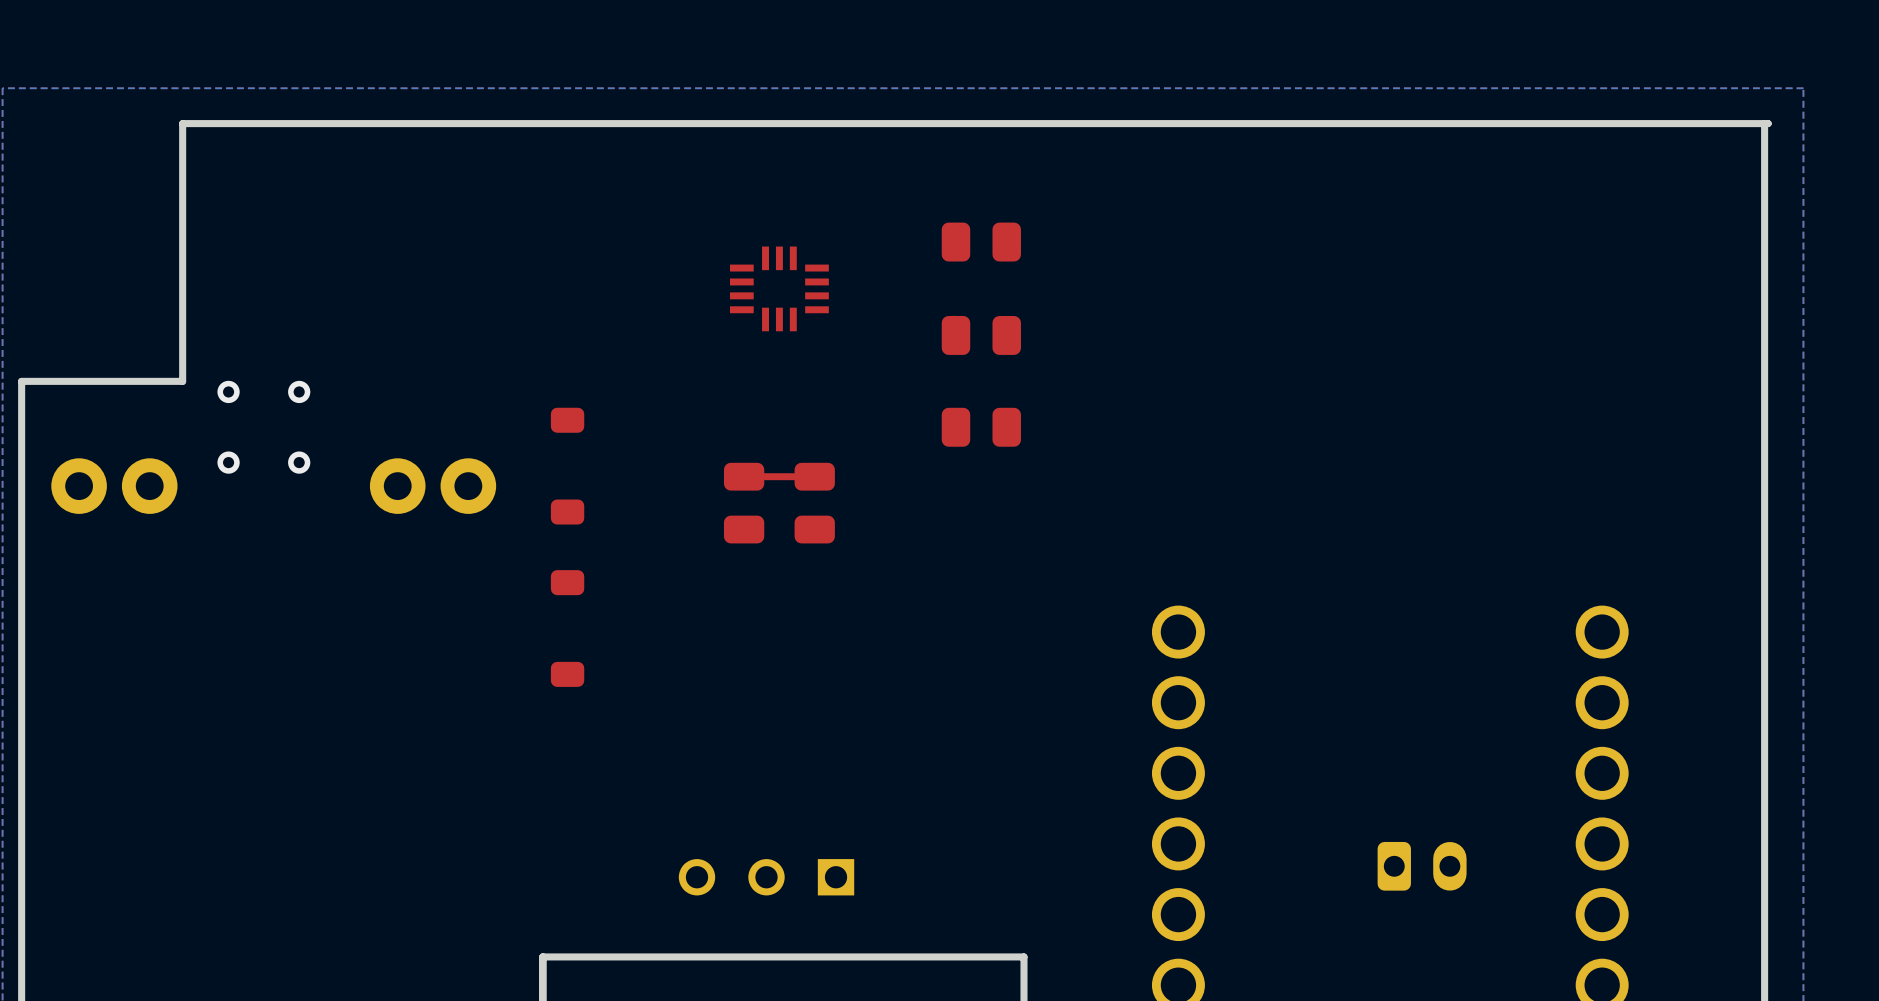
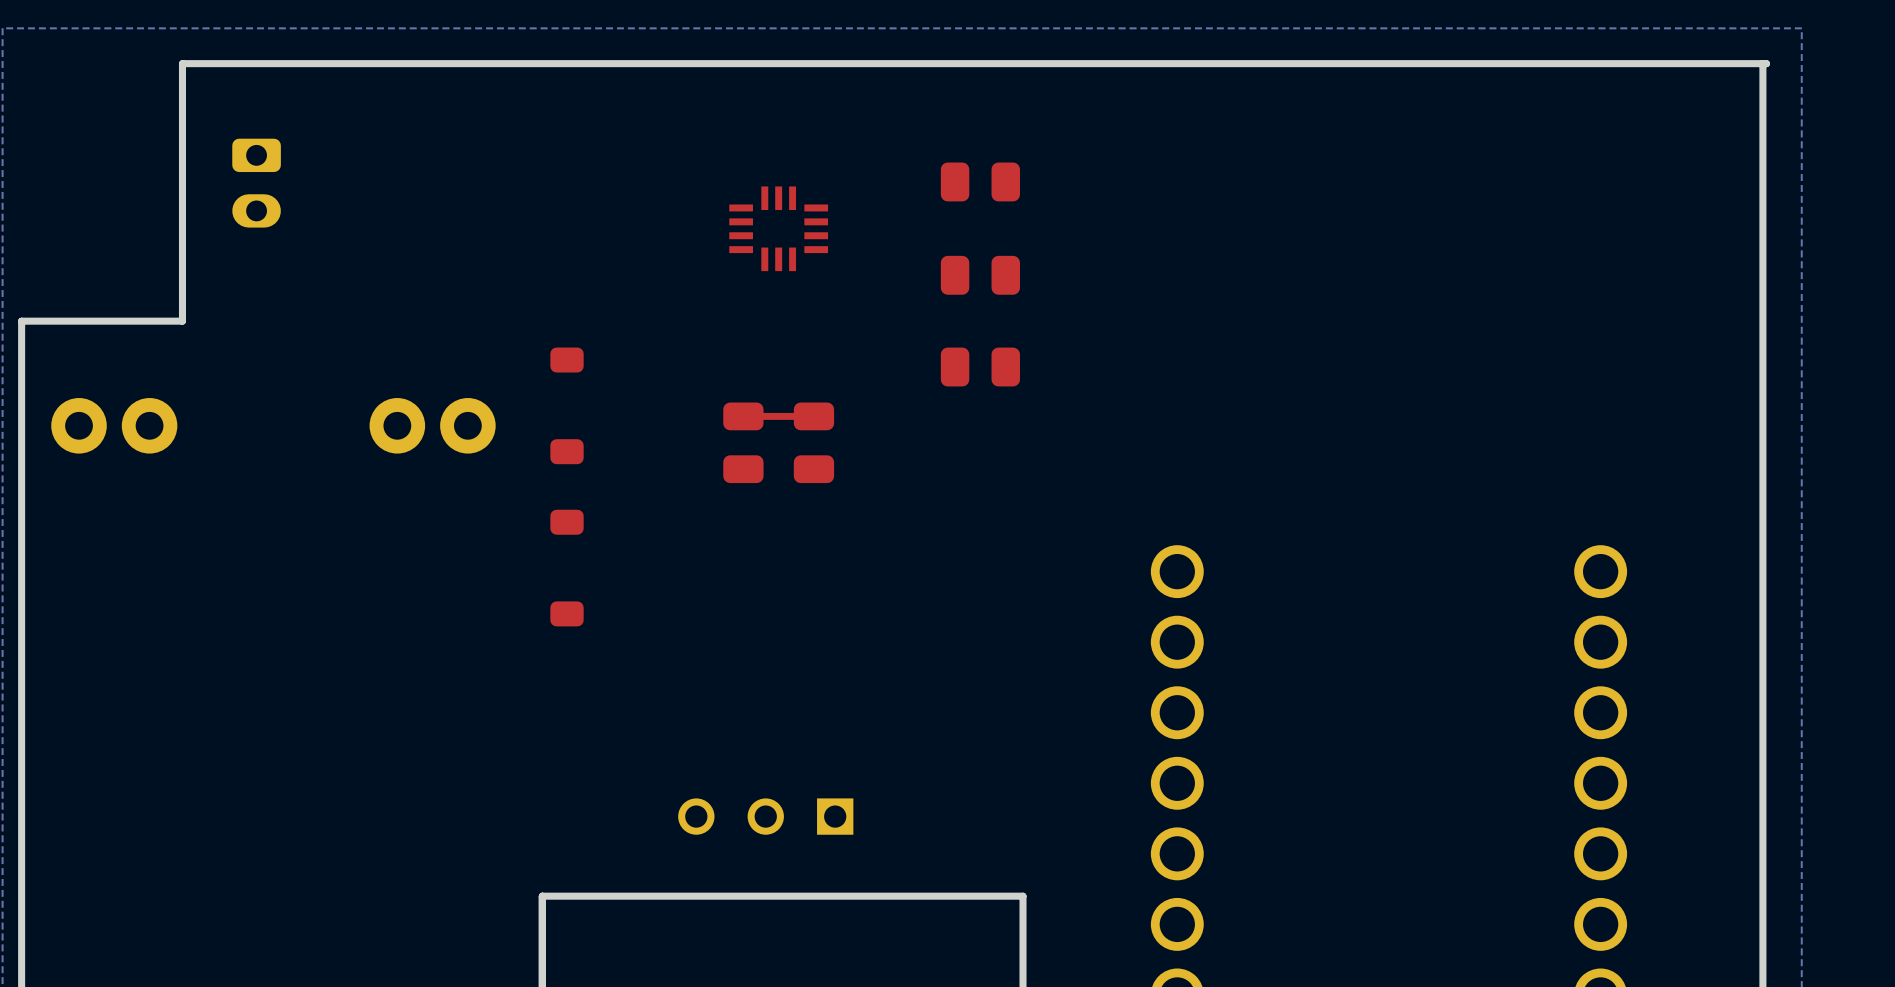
part: none -> (256, 183)
via: (228, 391) -> none
via: (299, 391) -> none
via: (228, 462) -> none
via: (299, 462) -> none
part: (1422, 866) -> none

